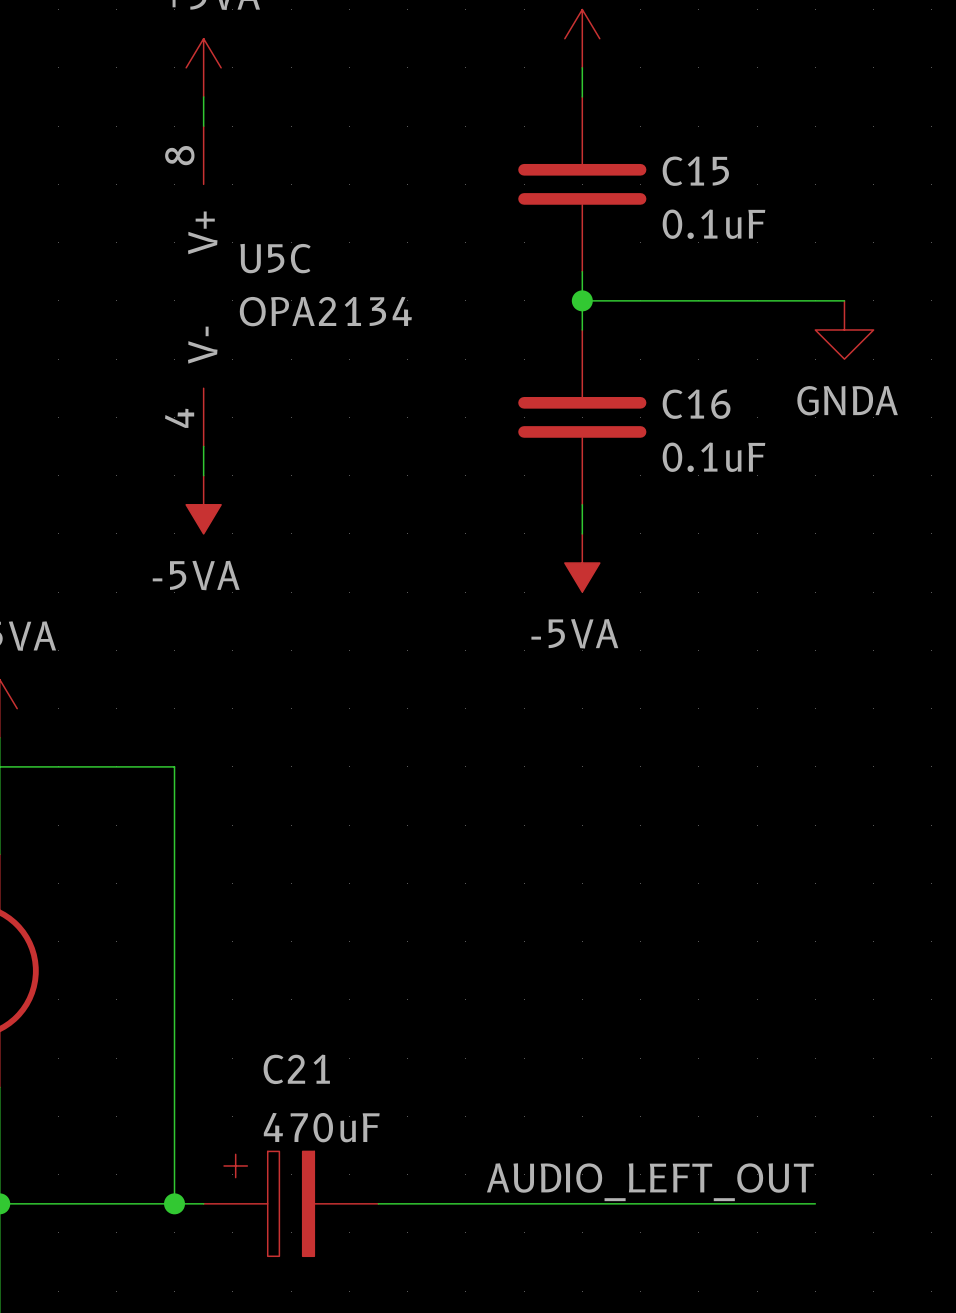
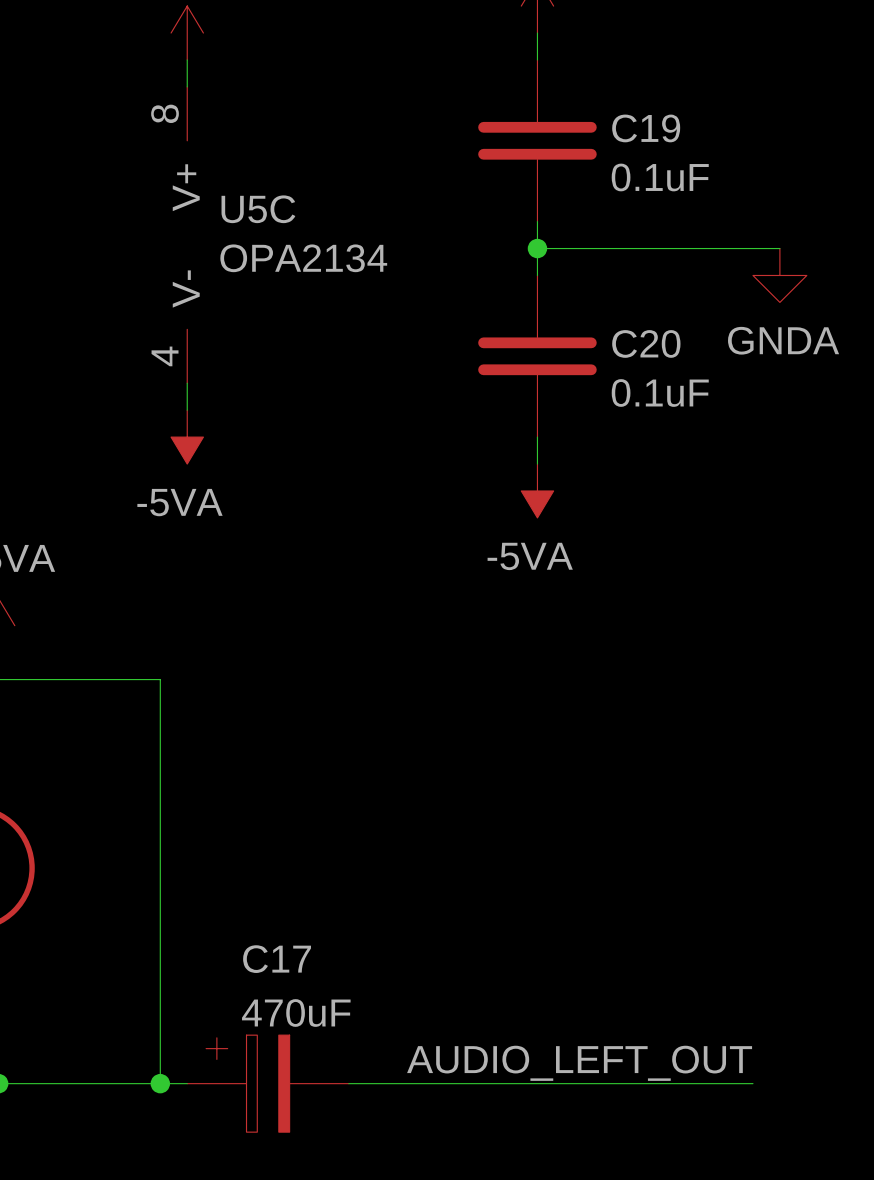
C15 name: C15 (695, 171) -> C19 (646, 128)
C16 name: C16 (696, 404) -> C20 (646, 343)
C21 name: C21 (296, 1069) -> C17 (277, 959)

